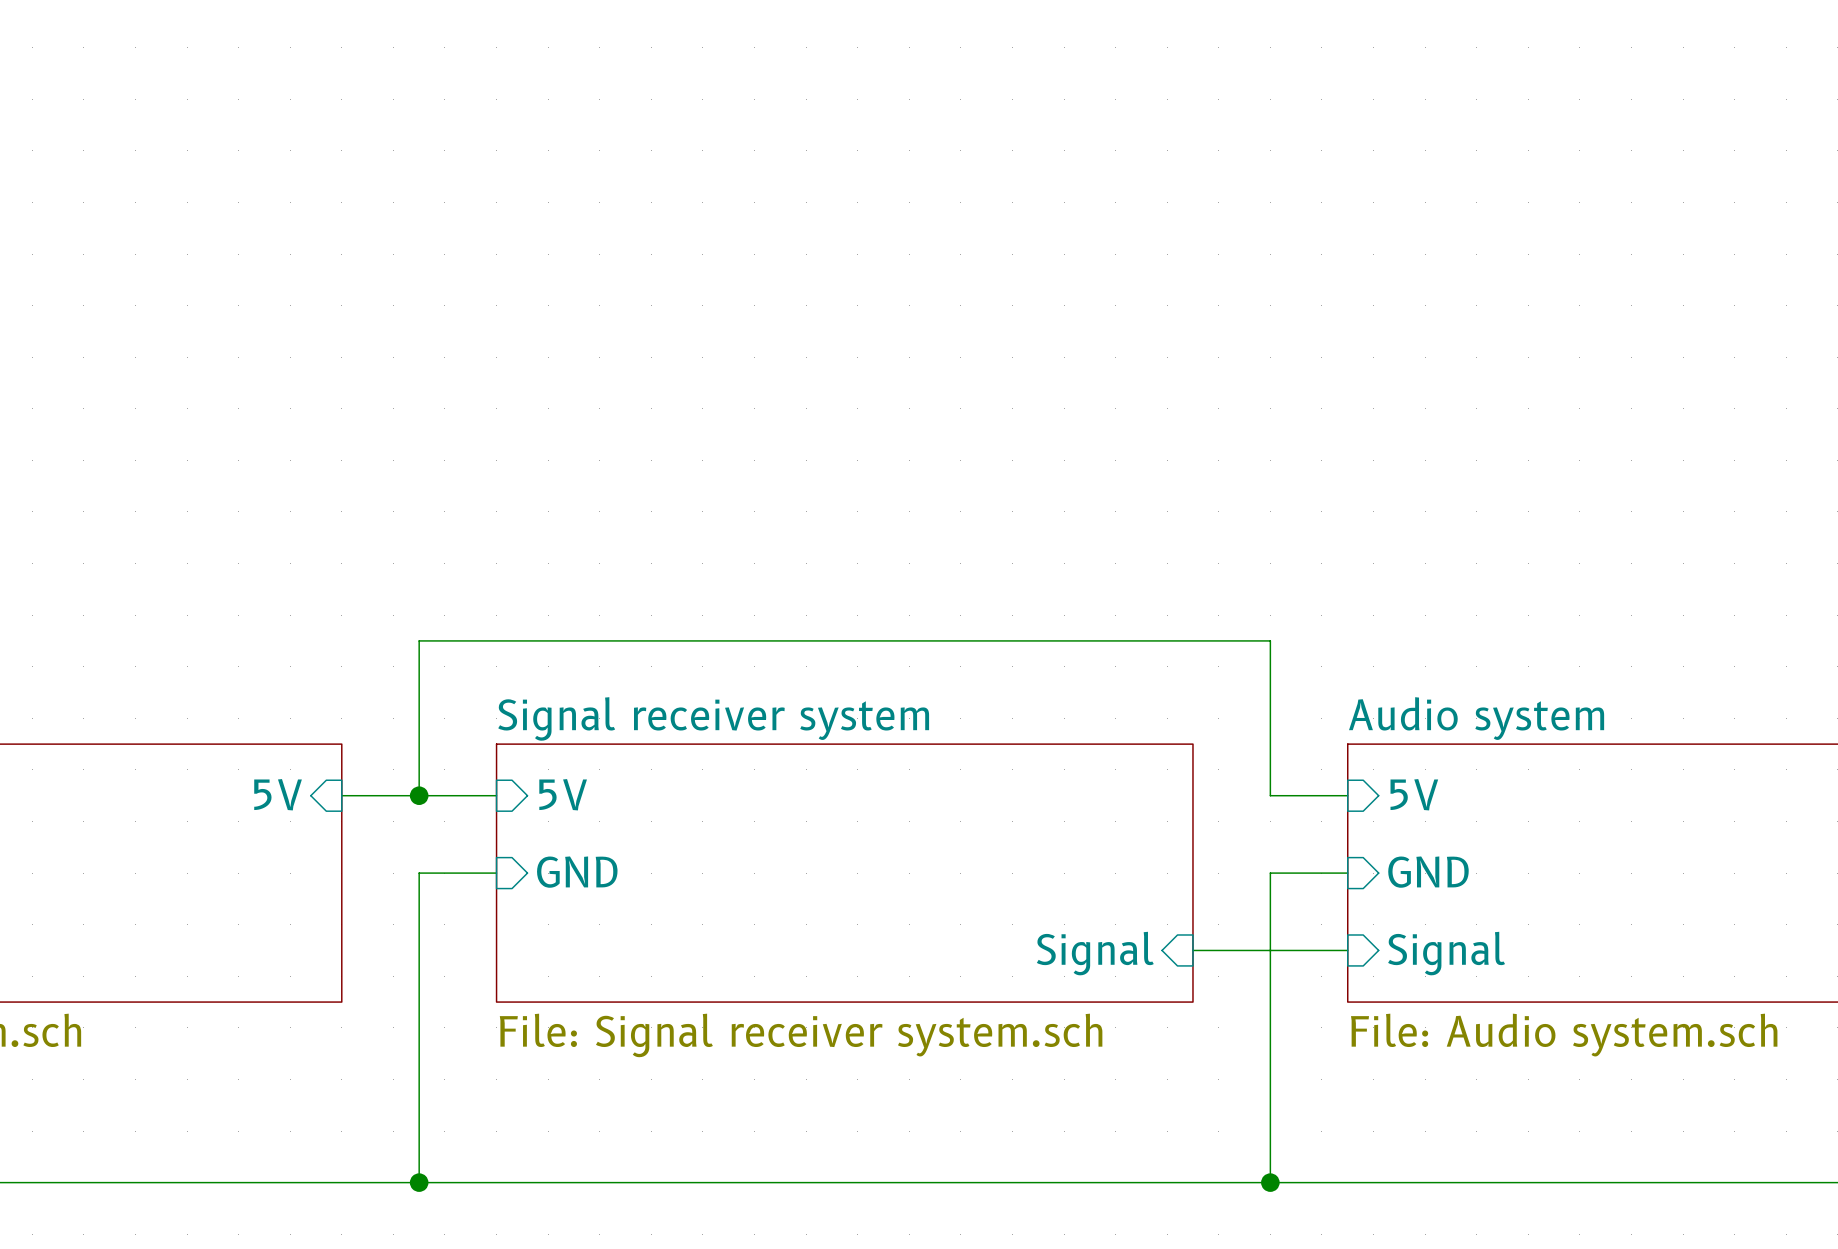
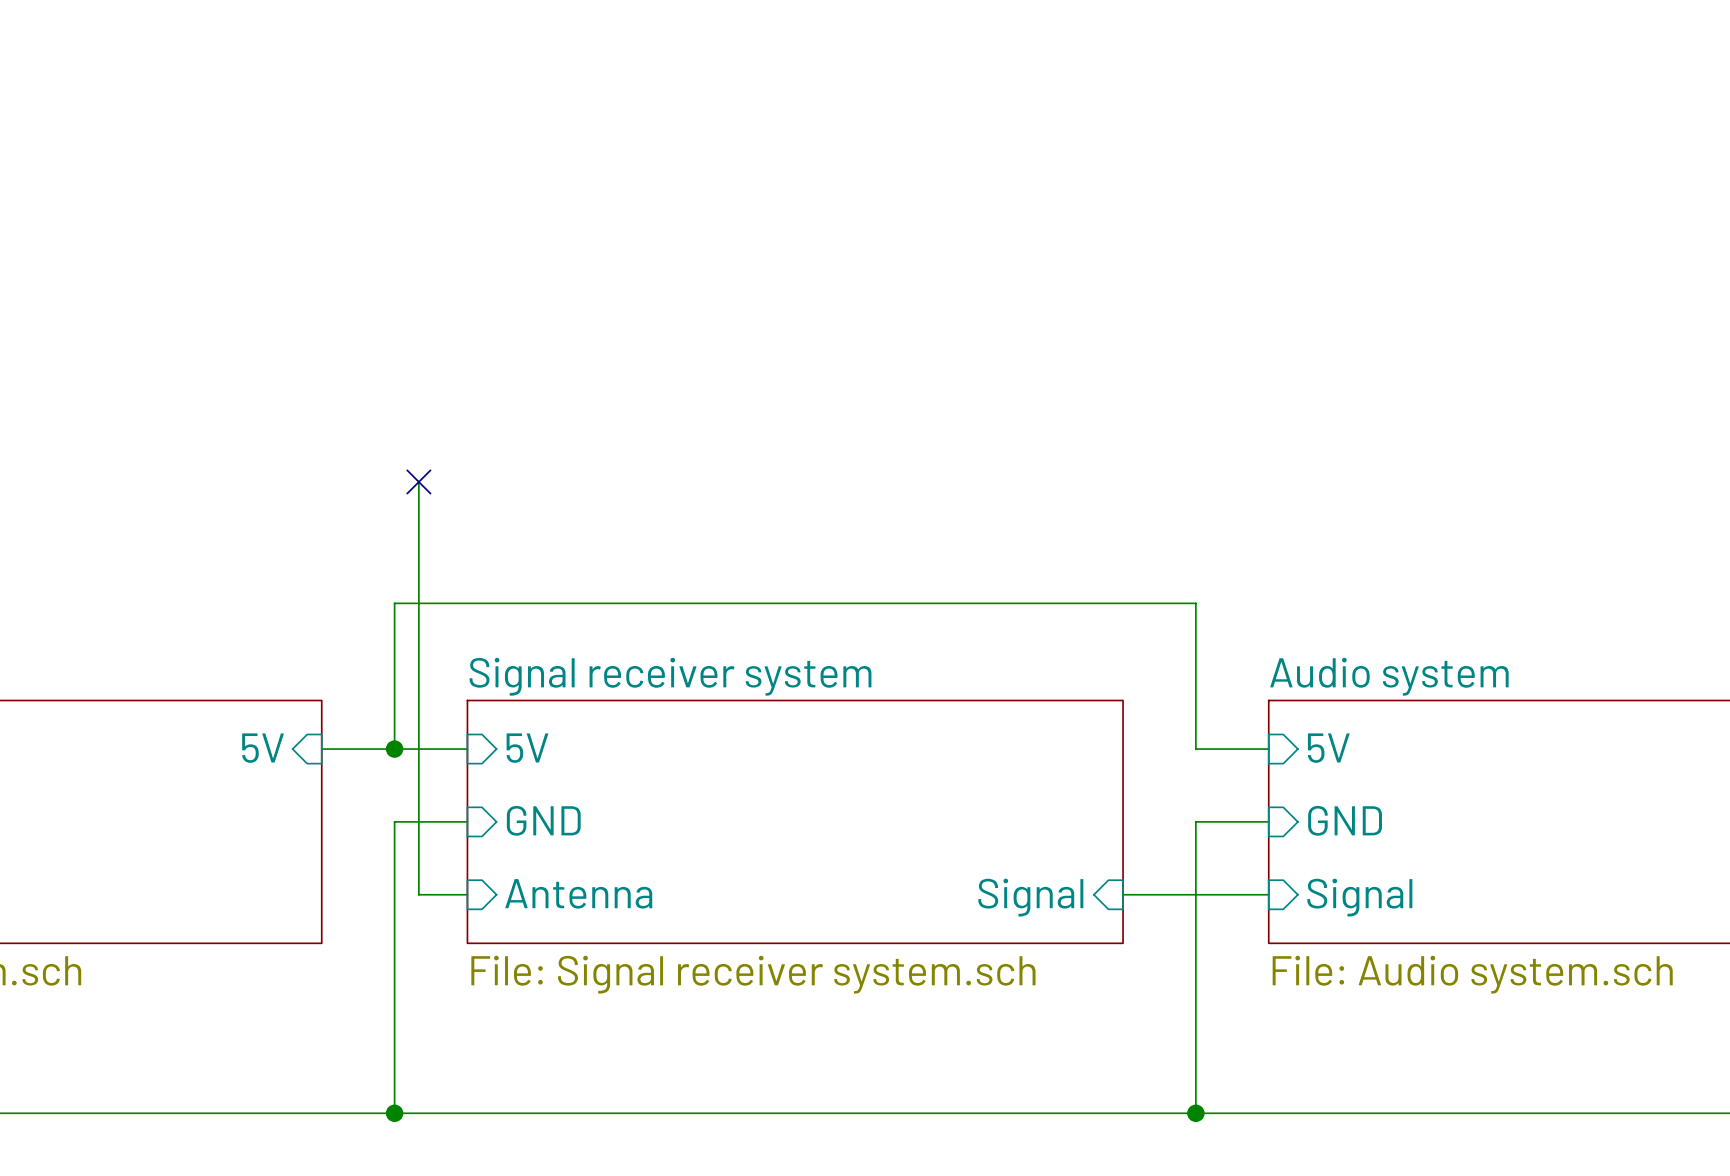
wire: none -> (418, 481) (418, 894) (467, 894)
no-connect mark: none -> (418, 481)
sheet pin: none -> Antenna (578, 893)

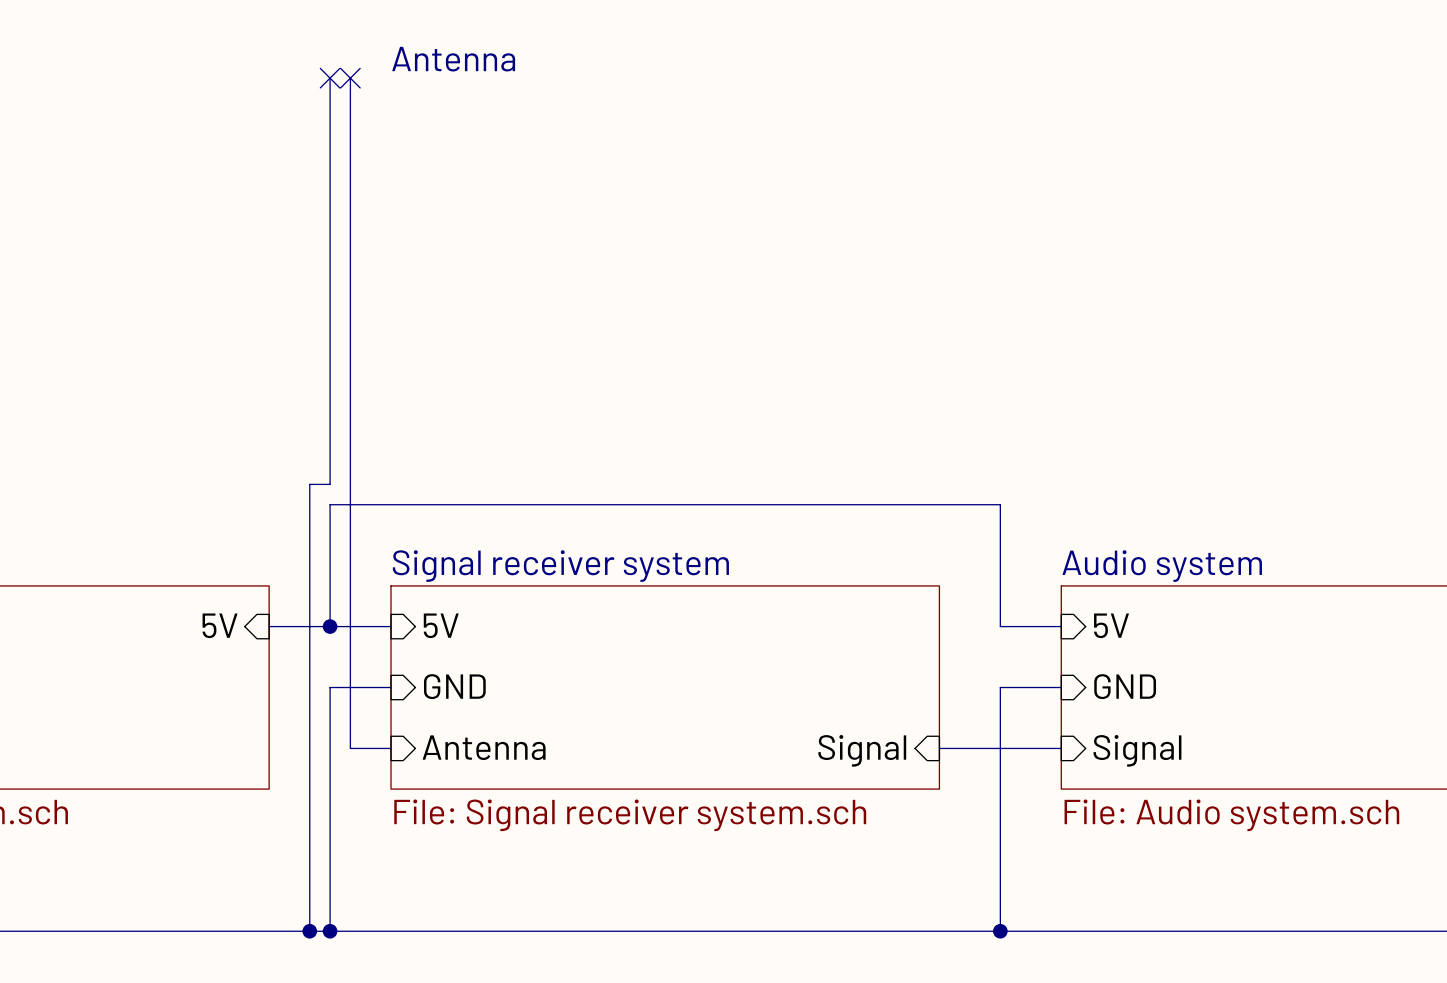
text: none -> Antenna (453, 59)
wire: none -> (330, 78) (330, 484) (309, 484) (309, 931)
no-connect mark: none -> (330, 78)
wire: none -> (350, 78) (350, 403)
no-connect mark: none -> (350, 78)
no-connect mark: (418, 481) -> none
junction: none -> (309, 931)

